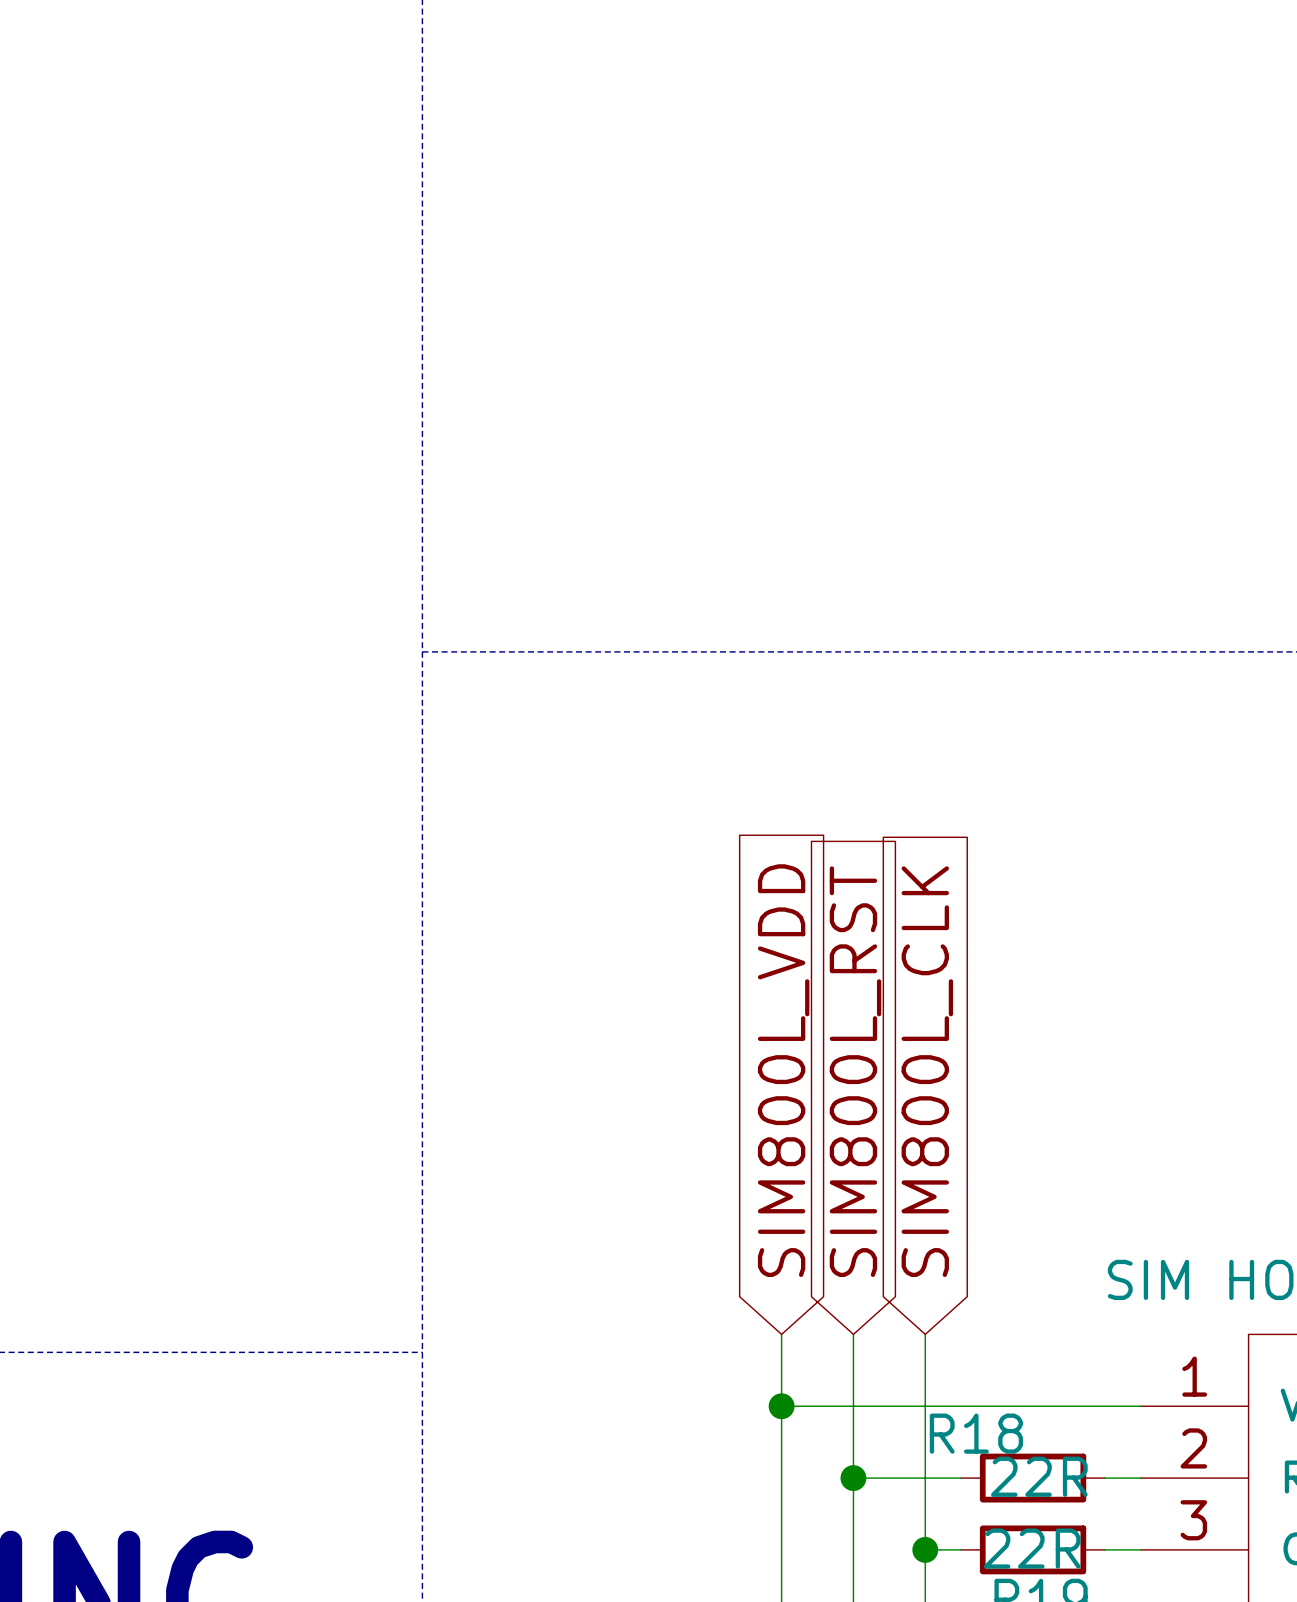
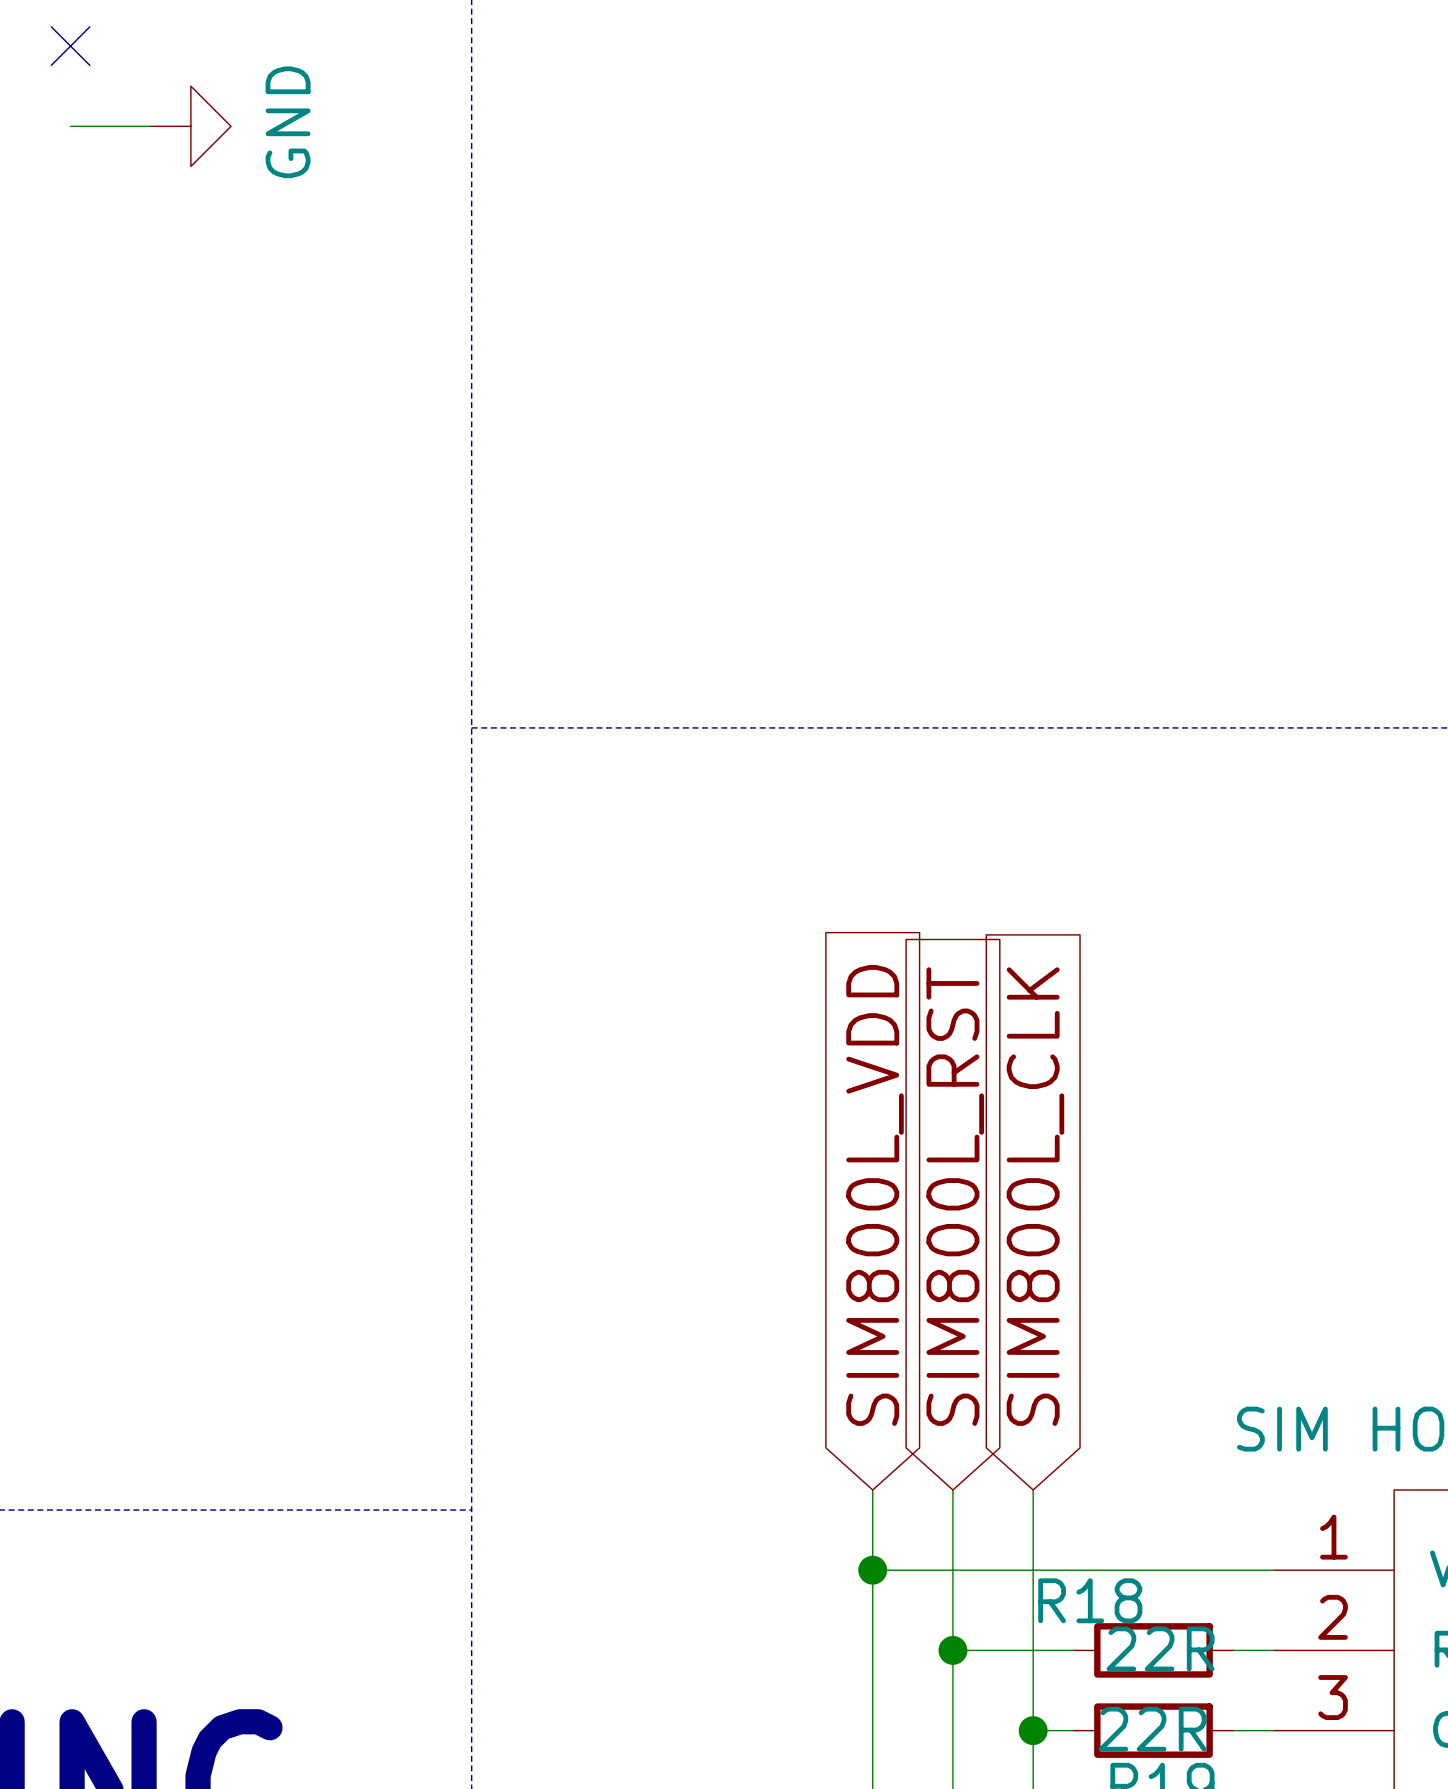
no-connect mark: none -> (70, 46)
wire: none -> (70, 126) (150, 126)
power symbol: none -> GND (190, 126)

